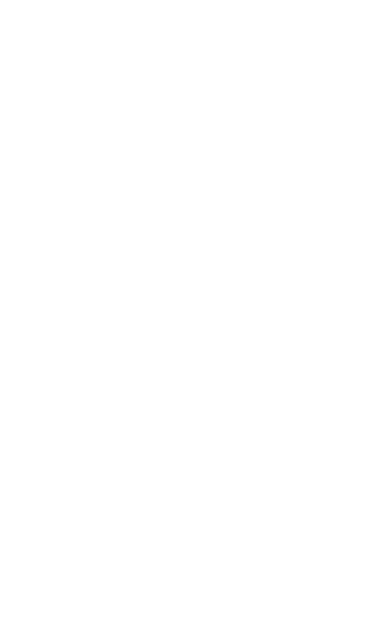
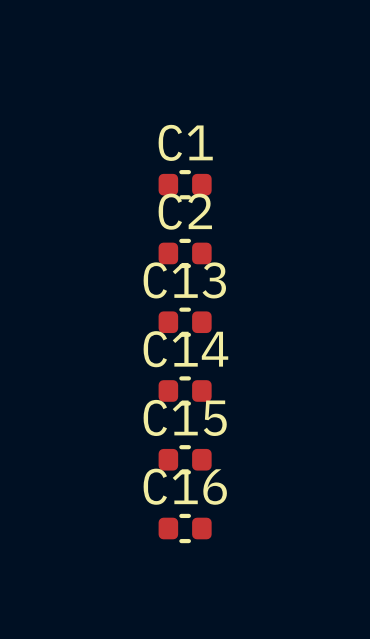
C1: none -> (185, 184)
C2: none -> (185, 253)
C13: none -> (185, 322)
C14: none -> (185, 390)
C15: none -> (185, 459)
C16: none -> (185, 528)

